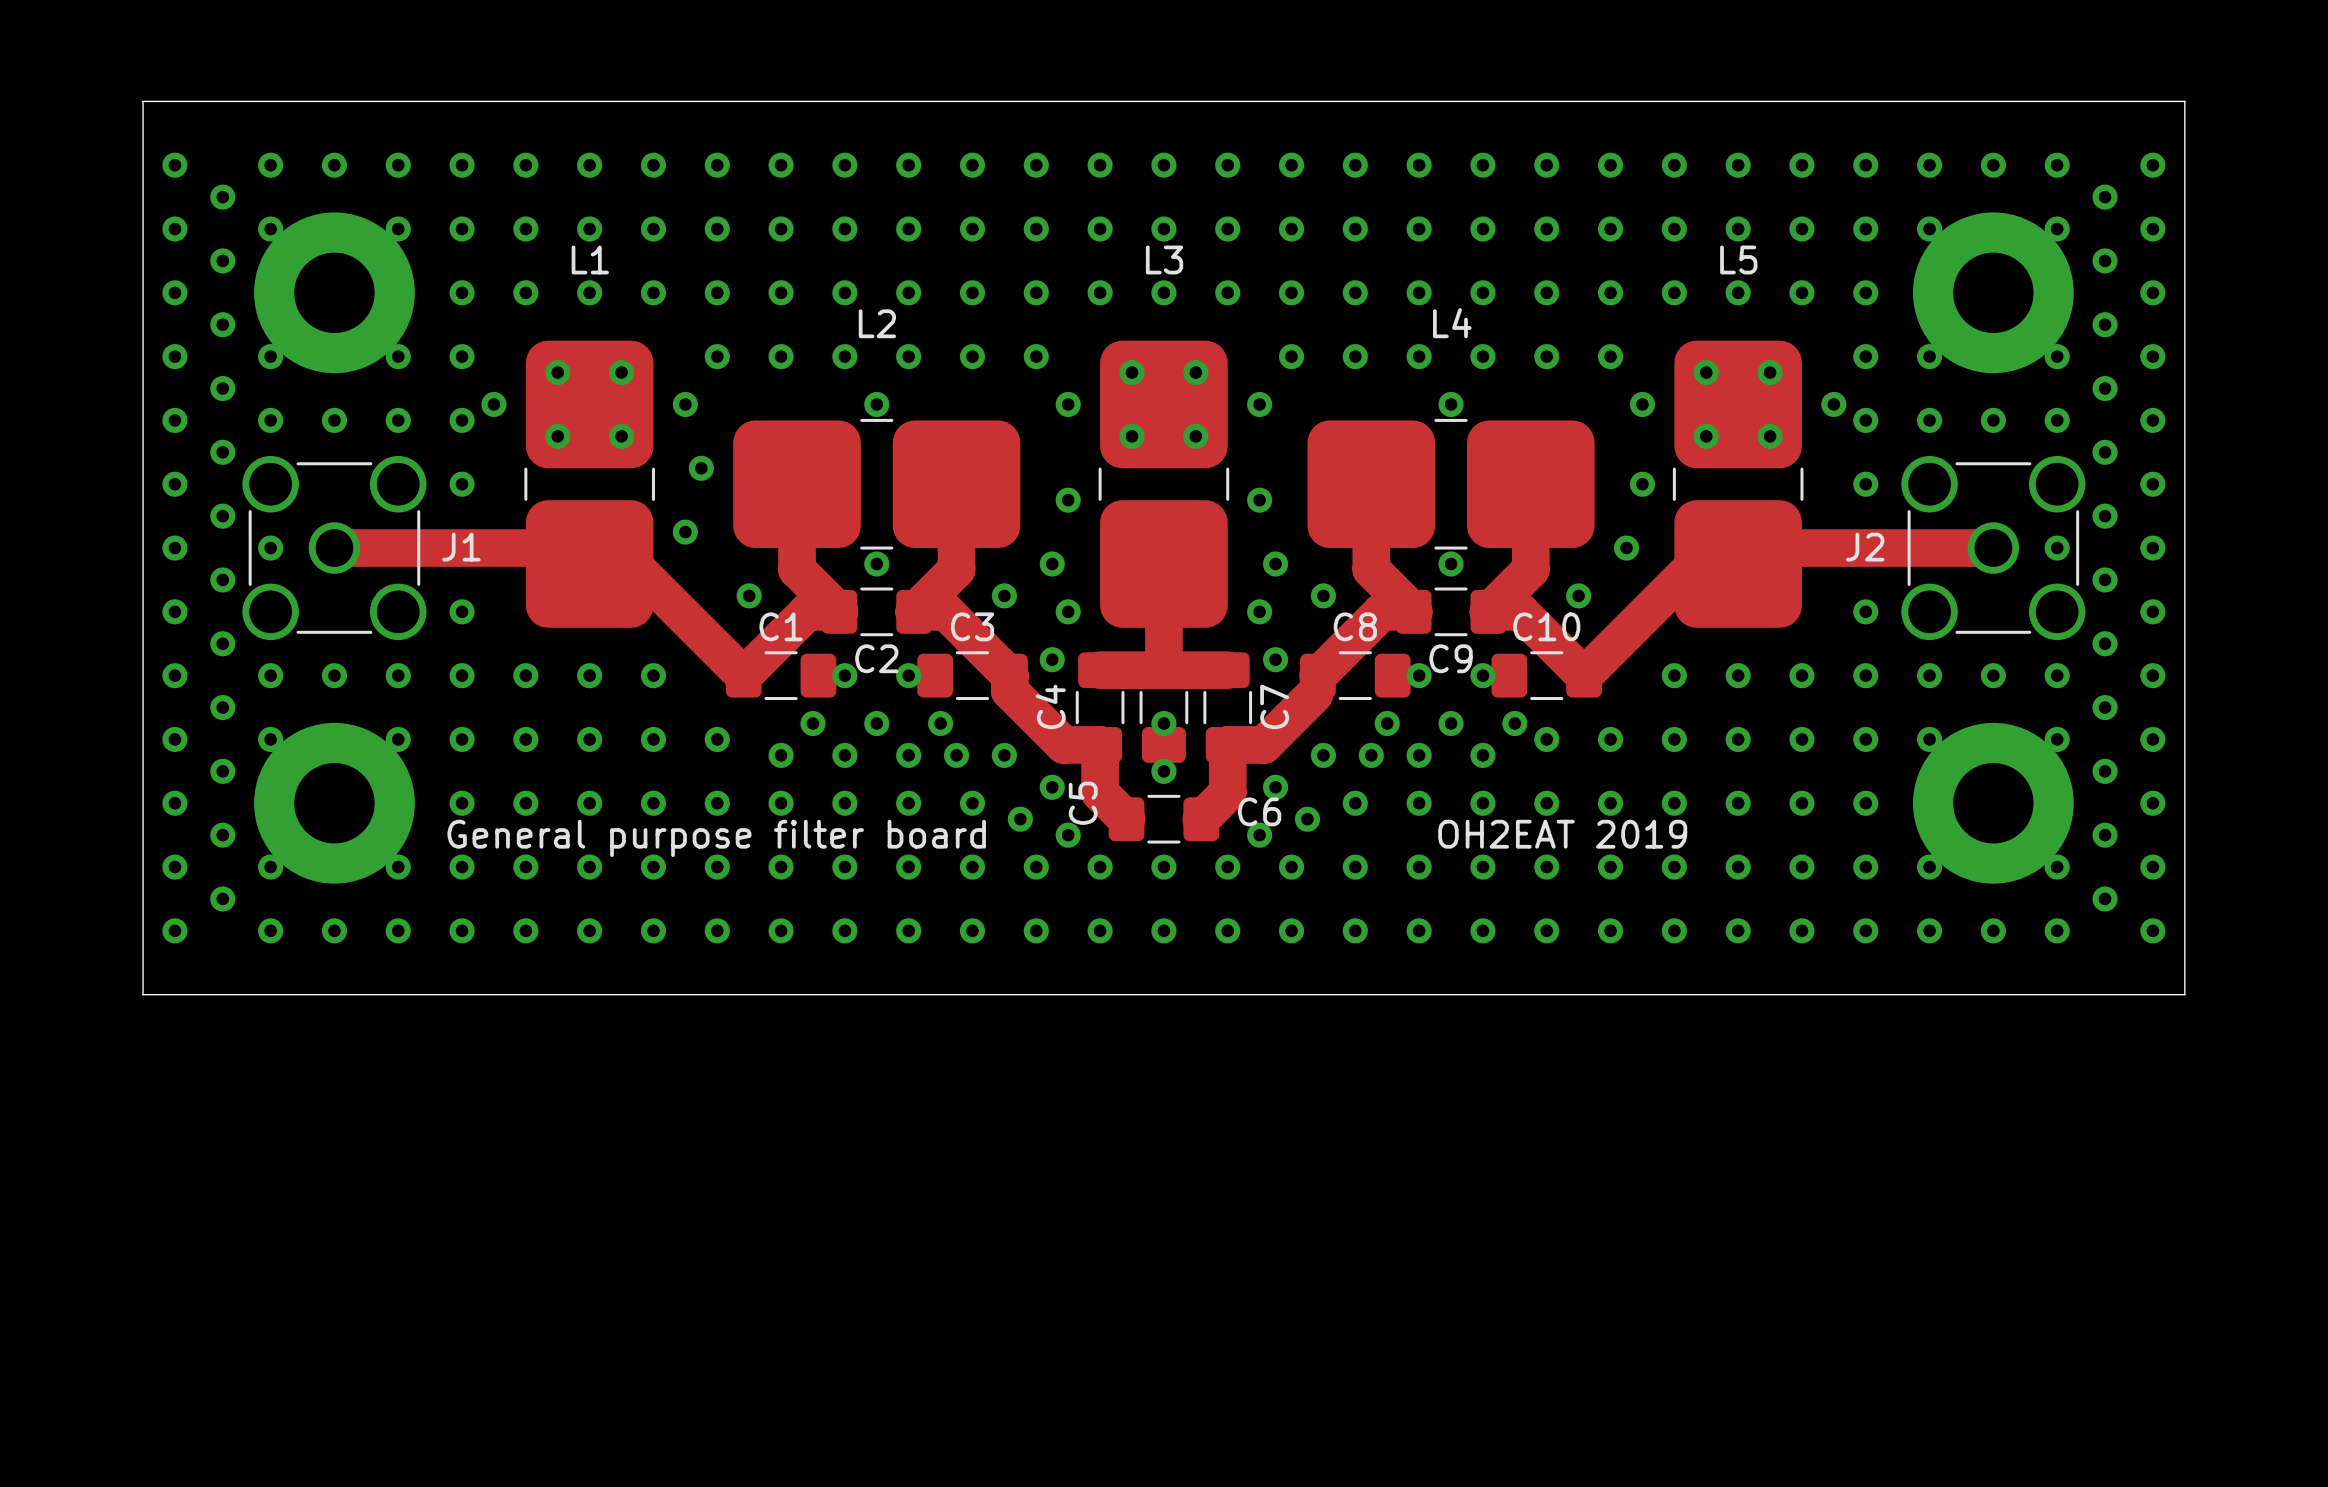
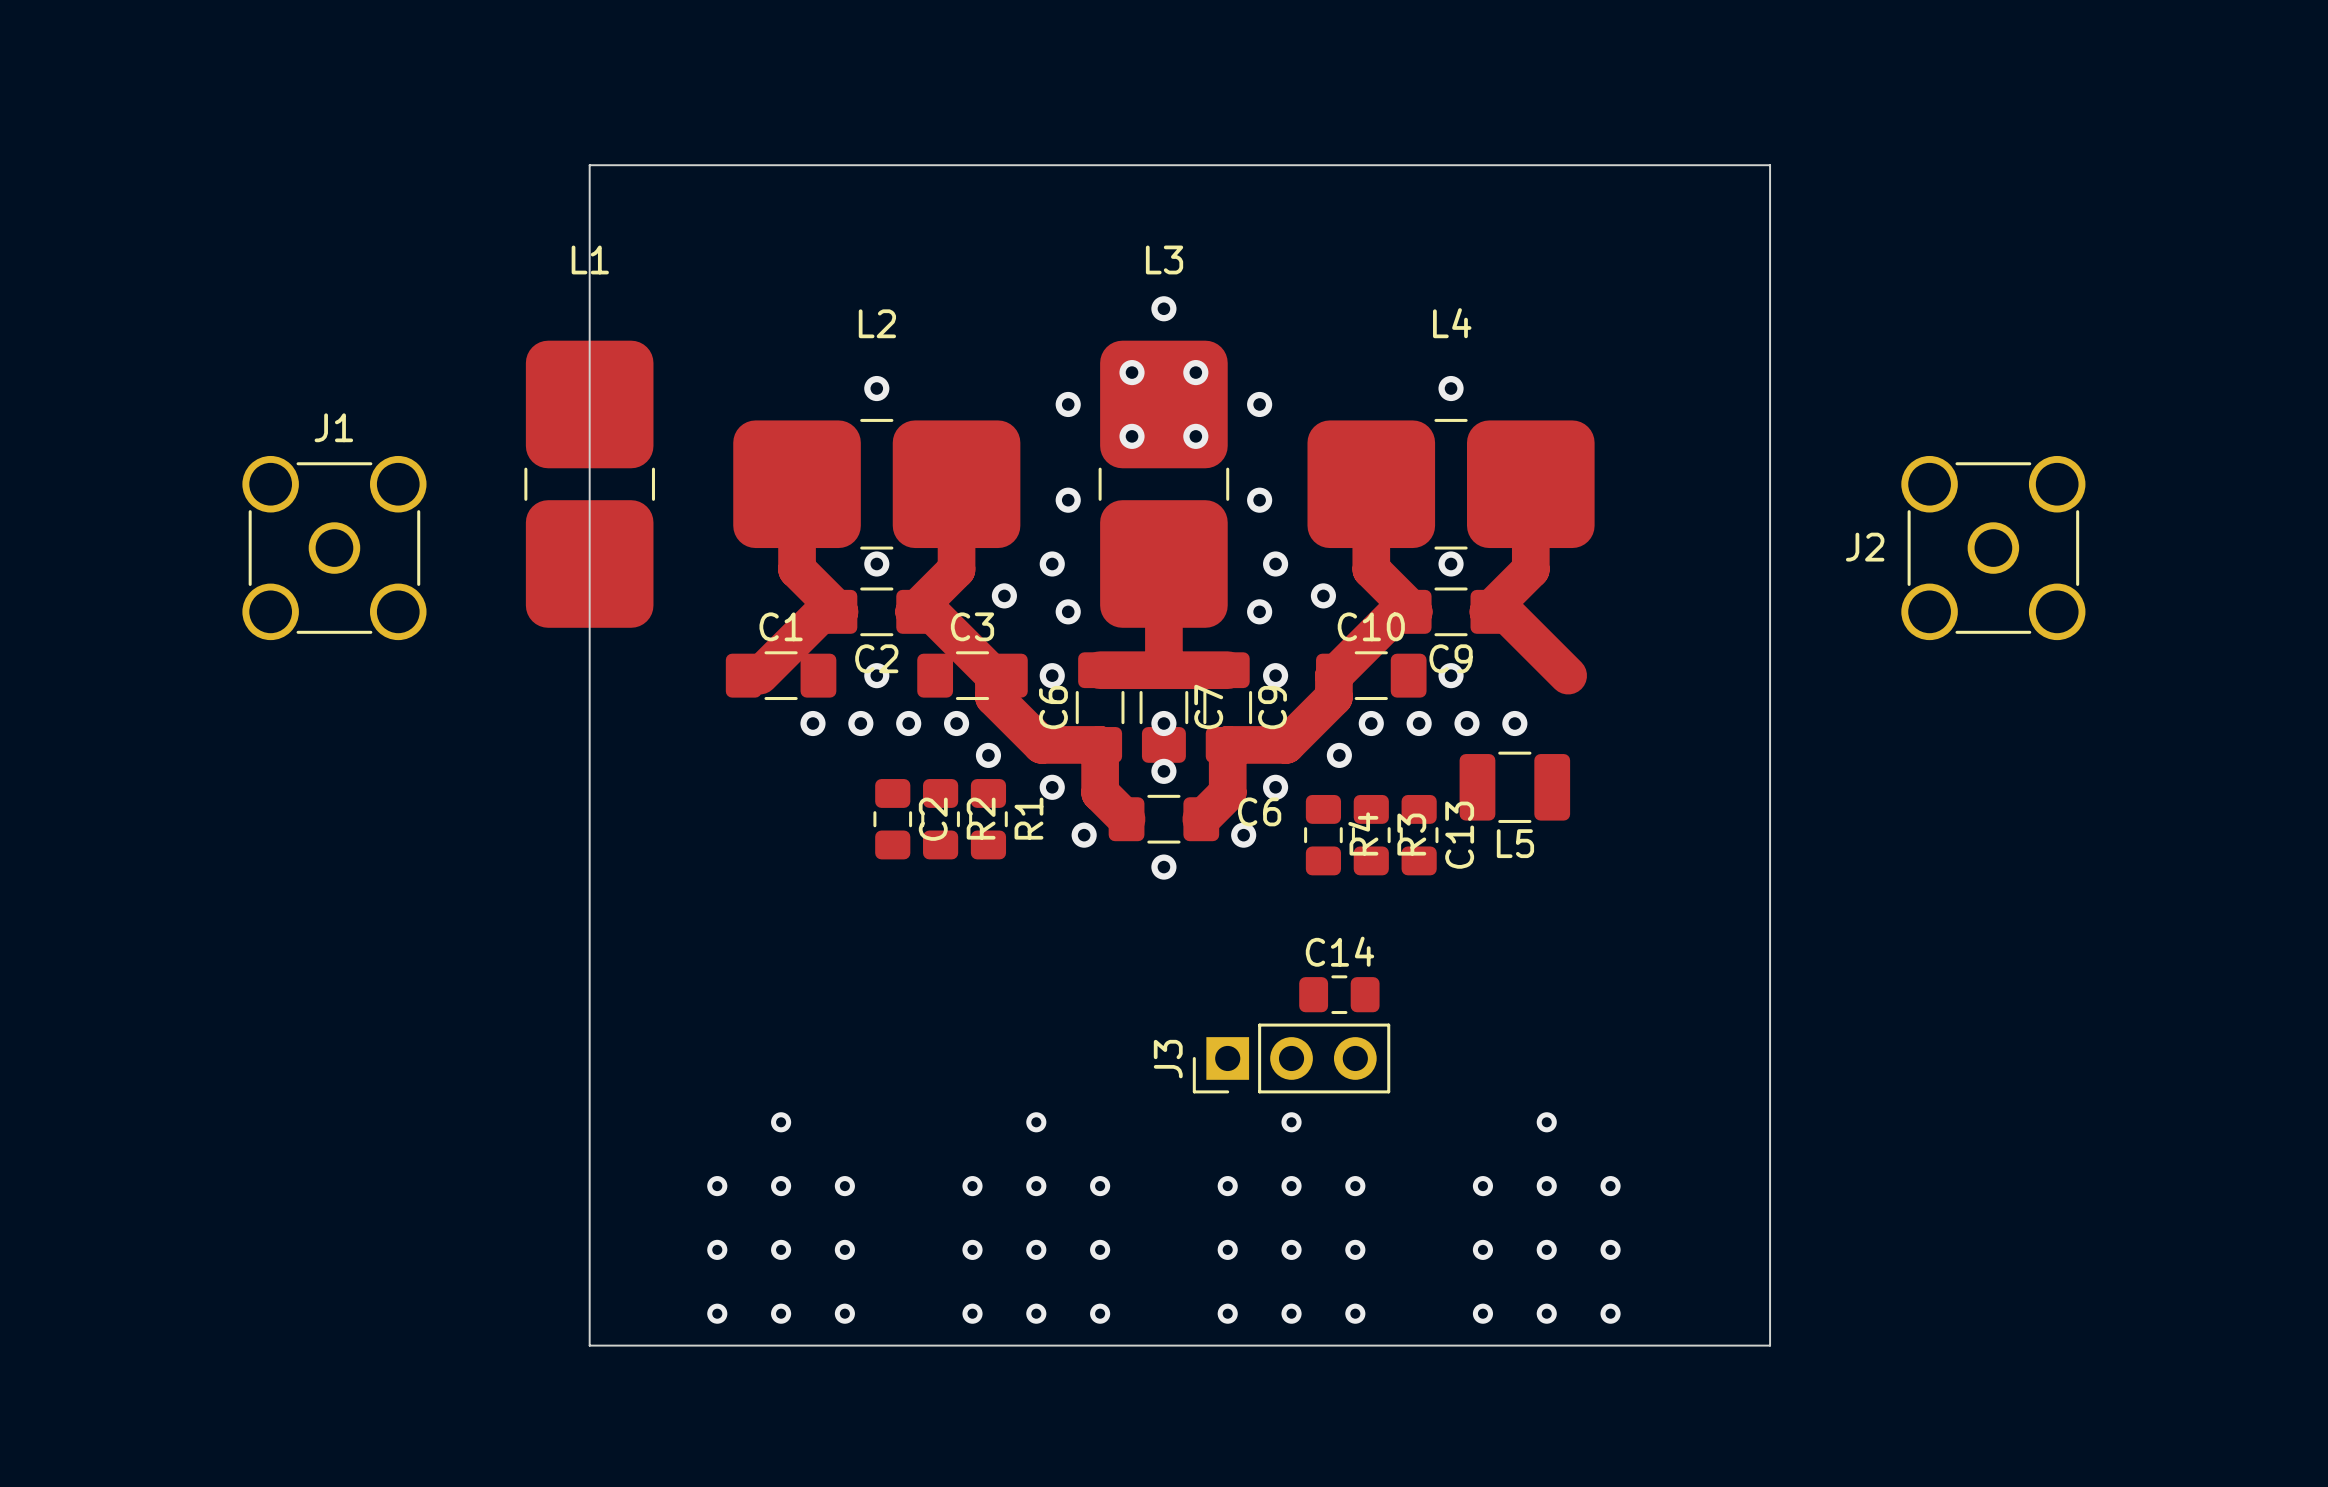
board edge: (143, 101) (143, 994) (2184, 994) (2184, 101) (143, 101) -> none
via: (174, 165) -> none
via: (270, 165) -> none
via: (334, 165) -> none
via: (398, 165) -> none
via: (462, 165) -> none
via: (525, 165) -> none
board edge: none -> (589, 165) (589, 1345) (1770, 1345) (1770, 165) (589, 165)
via: (589, 165) -> none
via: (653, 165) -> none
via: (717, 165) -> none
via: (781, 165) -> none
via: (844, 165) -> none
via: (908, 165) -> none
via: (972, 165) -> none
via: (1036, 165) -> none
via: (1100, 165) -> none
via: (1163, 165) -> none
via: (1227, 165) -> none
via: (1291, 165) -> none
via: (1355, 165) -> none
via: (1419, 165) -> none
via: (1482, 165) -> none
via: (1546, 165) -> none
via: (1610, 165) -> none
via: (1674, 165) -> none
via: (1738, 165) -> none
via: (1801, 165) -> none
via: (1865, 165) -> none
via: (1929, 165) -> none
via: (1993, 165) -> none
via: (2057, 165) -> none
via: (2152, 165) -> none
via: (222, 197) -> none
via: (2105, 197) -> none
via: (174, 229) -> none
via: (270, 229) -> none
via: (398, 229) -> none
via: (462, 229) -> none
via: (525, 229) -> none
via: (589, 229) -> none
via: (653, 229) -> none
via: (717, 229) -> none
via: (781, 229) -> none
via: (844, 229) -> none
via: (908, 229) -> none
via: (972, 229) -> none
via: (1036, 229) -> none
via: (1100, 229) -> none
via: (1163, 229) -> none
via: (1227, 229) -> none
via: (1291, 229) -> none
via: (1355, 229) -> none
via: (1419, 229) -> none
via: (1482, 229) -> none
via: (1546, 229) -> none
via: (1610, 229) -> none
via: (1674, 229) -> none
via: (1738, 229) -> none
via: (1801, 229) -> none
via: (1865, 229) -> none
via: (1929, 229) -> none
via: (2057, 229) -> none
via: (2152, 229) -> none
L5 name position: L5 (1738, 259) -> L5 (1515, 843)
via: (222, 260) -> none
via: (2105, 260) -> none
via: (174, 292) -> none
part: (334, 292) -> none
via: (462, 292) -> none
via: (525, 292) -> none
via: (589, 292) -> none
via: (653, 292) -> none
via: (717, 292) -> none
via: (781, 292) -> none
via: (844, 292) -> none
via: (908, 292) -> none
via: (972, 292) -> none
via: (1036, 292) -> none
via: (1100, 292) -> none
via position: (1163, 292) -> (1163, 308)
via: (1227, 292) -> none
via: (1291, 292) -> none
via: (1355, 292) -> none
via: (1419, 292) -> none
via: (1482, 292) -> none
via: (1546, 292) -> none
via: (1610, 292) -> none
via: (1674, 292) -> none
via: (1738, 292) -> none
via: (1801, 292) -> none
via: (1865, 292) -> none
part: (1993, 292) -> none
via: (2152, 292) -> none
via: (222, 324) -> none
via: (2105, 324) -> none
L5 footprint: [1672, 340, 1804, 628] -> [1459, 751, 1571, 823]
via: (174, 356) -> none
via: (270, 356) -> none
via: (398, 356) -> none
via: (462, 356) -> none
via: (717, 356) -> none
via: (781, 356) -> none
via: (844, 356) -> none
via: (908, 356) -> none
via: (972, 356) -> none
via: (1036, 356) -> none
via: (1291, 356) -> none
via: (1355, 356) -> none
via: (1419, 356) -> none
via: (1482, 356) -> none
via: (1546, 356) -> none
via: (1610, 356) -> none
via: (1865, 356) -> none
via: (1929, 356) -> none
via: (2057, 356) -> none
via: (2152, 356) -> none
via: (557, 372) -> none
via: (621, 372) -> none
via: (1706, 372) -> none
via: (1770, 372) -> none
via: (222, 388) -> none
via: (2105, 388) -> none
via: (493, 404) -> none
via: (685, 404) -> none
via position: (876, 404) -> (876, 388)
via position: (1451, 404) -> (1451, 388)
via: (1642, 404) -> none
via: (1833, 404) -> none
via: (174, 420) -> none
via: (270, 420) -> none
via: (334, 420) -> none
via: (398, 420) -> none
via: (462, 420) -> none
via: (1865, 420) -> none
via: (1929, 420) -> none
via: (1993, 420) -> none
via: (2057, 420) -> none
via: (2152, 420) -> none
via: (557, 436) -> none
via: (621, 436) -> none
via: (1706, 436) -> none
via: (1770, 436) -> none
via: (222, 452) -> none
via: (2105, 452) -> none
via: (701, 468) -> none
via: (174, 484) -> none
via: (462, 484) -> none
via: (1642, 484) -> none
via: (1865, 484) -> none
via: (2152, 484) -> none
via: (222, 516) -> none
via: (2105, 516) -> none
via: (685, 532) -> none
J1 name position: J1 (461, 547) -> J1 (333, 427)
via: (174, 548) -> none
via: (270, 548) -> none
track: (334, 548) (573, 548) (589, 563) (632, 563) (743, 675) (807, 611) (823, 611) -> (759, 675) (823, 611)
via: (1626, 548) -> none
track: (1993, 548) (1754, 548) (1738, 563) (1695, 563) (1584, 675) (1520, 611) (1504, 611) -> (1568, 675) (1504, 611)
via: (2057, 548) -> none
via: (2152, 548) -> none
via: (222, 579) -> none
via: (2105, 579) -> none
via: (749, 595) -> none
via: (1578, 595) -> none
via: (174, 611) -> none
via: (462, 611) -> none
track: (930, 611) (946, 611) (1009, 675) (1009, 690) (1063, 744) -> (930, 611) (993, 675) (993, 697) (1041, 744) (1063, 744)
track: (1397, 611) (1381, 611) (1317, 675) -> (1397, 611) (1333, 675) (1333, 697) (1286, 744) (1263, 744)
via: (1865, 611) -> none
via: (2152, 611) -> none
via: (222, 643) -> none
via: (2105, 643) -> none
via position: (1052, 659) -> (1052, 675)
via position: (1275, 659) -> (1275, 675)
via: (174, 675) -> none
via: (270, 675) -> none
via: (334, 675) -> none
via: (398, 675) -> none
via: (462, 675) -> none
via: (525, 675) -> none
via: (589, 675) -> none
via: (653, 675) -> none
via: (844, 675) -> none
via: none -> (876, 675)
via: (908, 675) -> none
C8: (1355, 675) -> none
via: (1419, 675) -> none
via: none -> (1451, 675)
via: (1482, 675) -> none
C10 position: (1546, 675) -> (1371, 675)
via: (1674, 675) -> none
via: (1738, 675) -> none
via: (1801, 675) -> none
via: (1865, 675) -> none
via: (1929, 675) -> none
via: (1993, 675) -> none
via: (2057, 675) -> none
via: (2152, 675) -> none
track: (1314, 694) (1263, 744) -> none
C4 name: C4 (1050, 706) -> C6 (1053, 707)
C7 name: C7 (1274, 706) -> C9 (1272, 707)
via: (222, 707) -> none
via: (2105, 707) -> none
via position: (876, 723) -> (860, 723)
via: none -> (908, 723)
via position: (940, 723) -> (956, 723)
via position: (1387, 723) -> (1371, 723)
via: none -> (1419, 723)
via position: (1451, 723) -> (1466, 723)
via: (174, 739) -> none
via: (270, 739) -> none
via: (398, 739) -> none
via: (462, 739) -> none
via: (525, 739) -> none
via: (589, 739) -> none
via: (653, 739) -> none
via: (717, 739) -> none
via: (1546, 739) -> none
via: (1610, 739) -> none
via: (1674, 739) -> none
via: (1738, 739) -> none
via: (1801, 739) -> none
via: (1865, 739) -> none
via: (1929, 739) -> none
via: (2057, 739) -> none
via: (2152, 739) -> none
via: (781, 755) -> none
via: (844, 755) -> none
via: (908, 755) -> none
via: (956, 755) -> none
via position: (1004, 755) -> (988, 755)
via position: (1323, 755) -> (1339, 755)
via: (1371, 755) -> none
via: (1419, 755) -> none
via: (1482, 755) -> none
via: (222, 771) -> none
via: (2105, 771) -> none
via: (174, 803) -> none
part: (334, 803) -> none
via: (462, 803) -> none
via: (525, 803) -> none
via: (589, 803) -> none
via: (653, 803) -> none
via: (717, 803) -> none
via: (781, 803) -> none
via: (844, 803) -> none
via: (908, 803) -> none
via: (972, 803) -> none
C5 name: C5 (1083, 803) -> C7 (1208, 706)
via: (1355, 803) -> none
via: (1419, 803) -> none
via: (1482, 803) -> none
via: (1546, 803) -> none
via: (1610, 803) -> none
via: (1674, 803) -> none
via: (1738, 803) -> none
via: (1801, 803) -> none
via: (1865, 803) -> none
part: (1993, 803) -> none
via: (2152, 803) -> none
C2: none -> (892, 819)
R2: none -> (940, 819)
R1: none -> (988, 819)
via: (1020, 819) -> none
via: (1307, 819) -> none
text: OH2EAT 2019 (1562, 834) -> none
via: (222, 835) -> none
via position: (1068, 835) -> (1084, 835)
via position: (1259, 835) -> (1243, 835)
R4: none -> (1323, 835)
R3: none -> (1371, 835)
C13: none -> (1419, 835)
via: (2105, 835) -> none
text: General purpose filter board (716, 838) -> none
via: (174, 867) -> none
via: (270, 867) -> none
via: (398, 867) -> none
via: (462, 867) -> none
via: (525, 867) -> none
via: (589, 867) -> none
via: (653, 867) -> none
via: (717, 867) -> none
via: (781, 867) -> none
via: (844, 867) -> none
via: (908, 867) -> none
via: (972, 867) -> none
via: (1036, 867) -> none
via: (1100, 867) -> none
via: (1227, 867) -> none
via: (1291, 867) -> none
via: (1355, 867) -> none
via: (1419, 867) -> none
via: (1482, 867) -> none
via: (1546, 867) -> none
via: (1610, 867) -> none
via: (1674, 867) -> none
via: (1738, 867) -> none
via: (1801, 867) -> none
via: (1865, 867) -> none
via: (1929, 867) -> none
via: (2057, 867) -> none
via: (2152, 867) -> none
via: (222, 898) -> none
via: (2105, 898) -> none
via: (174, 930) -> none
via: (270, 930) -> none
via: (334, 930) -> none
via: (398, 930) -> none
via: (462, 930) -> none
via: (525, 930) -> none
via: (589, 930) -> none
via: (653, 930) -> none
via: (717, 930) -> none
via: (781, 930) -> none
via: (844, 930) -> none
via: (908, 930) -> none
via: (972, 930) -> none
via: (1036, 930) -> none
via: (1100, 930) -> none
via: (1163, 930) -> none
via: (1227, 930) -> none
via: (1291, 930) -> none
via: (1355, 930) -> none
via: (1419, 930) -> none
via: (1482, 930) -> none
via: (1546, 930) -> none
via: (1610, 930) -> none
via: (1674, 930) -> none
via: (1738, 930) -> none
via: (1801, 930) -> none
via: (1865, 930) -> none
via: (1929, 930) -> none
via: (1993, 930) -> none
via: (2057, 930) -> none
via: (2152, 930) -> none
C14: none -> (1339, 994)
J3: none -> (1291, 1058)
via: none -> (781, 1122)
via: none -> (1036, 1122)
via: none -> (1291, 1122)
via: none -> (1546, 1122)
via: none -> (717, 1186)
via: none -> (781, 1186)
via: none -> (844, 1186)
via: none -> (972, 1186)
via: none -> (1036, 1186)
via: none -> (1100, 1186)
via: none -> (1227, 1186)
via: none -> (1291, 1186)
via: none -> (1355, 1186)
via: none -> (1482, 1186)
via: none -> (1546, 1186)
via: none -> (1610, 1186)
via: none -> (717, 1249)
via: none -> (781, 1249)
via: none -> (844, 1249)
via: none -> (972, 1249)
via: none -> (1036, 1249)
via: none -> (1100, 1249)
via: none -> (1227, 1249)
via: none -> (1291, 1249)
via: none -> (1355, 1249)
via: none -> (1482, 1249)
via: none -> (1546, 1249)
via: none -> (1610, 1249)
via: none -> (717, 1313)
via: none -> (781, 1313)
via: none -> (844, 1313)
via: none -> (972, 1313)
via: none -> (1036, 1313)
via: none -> (1100, 1313)
via: none -> (1227, 1313)
via: none -> (1291, 1313)
via: none -> (1355, 1313)
via: none -> (1482, 1313)
via: none -> (1546, 1313)
via: none -> (1610, 1313)

